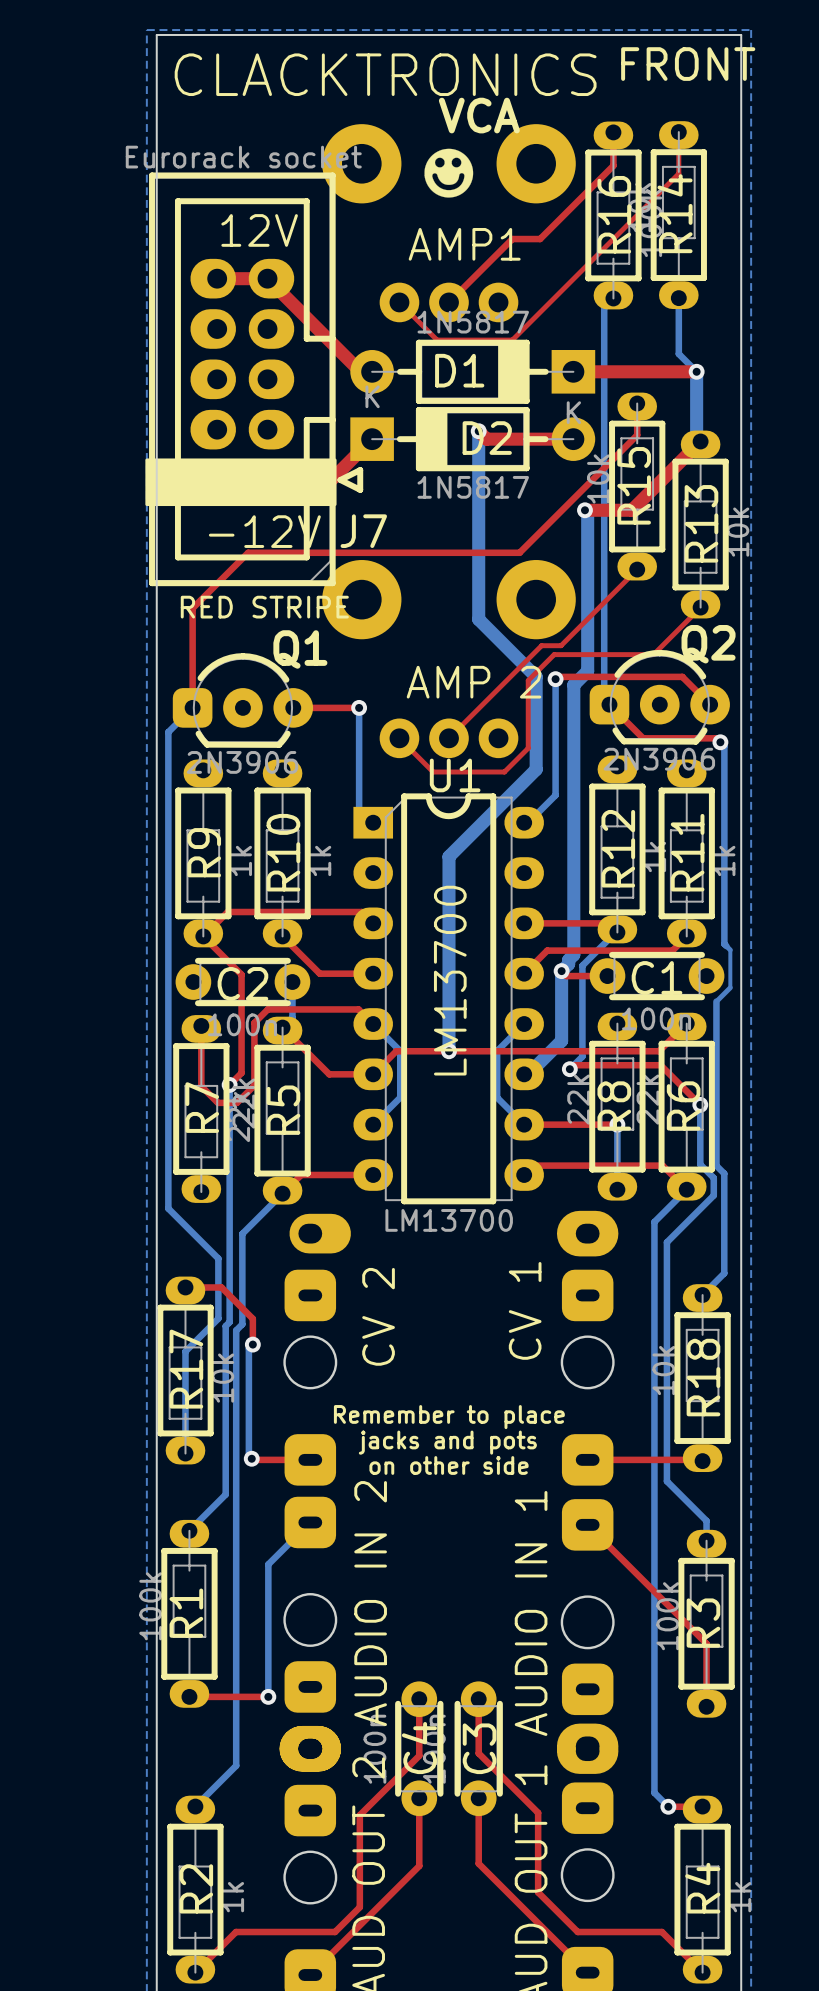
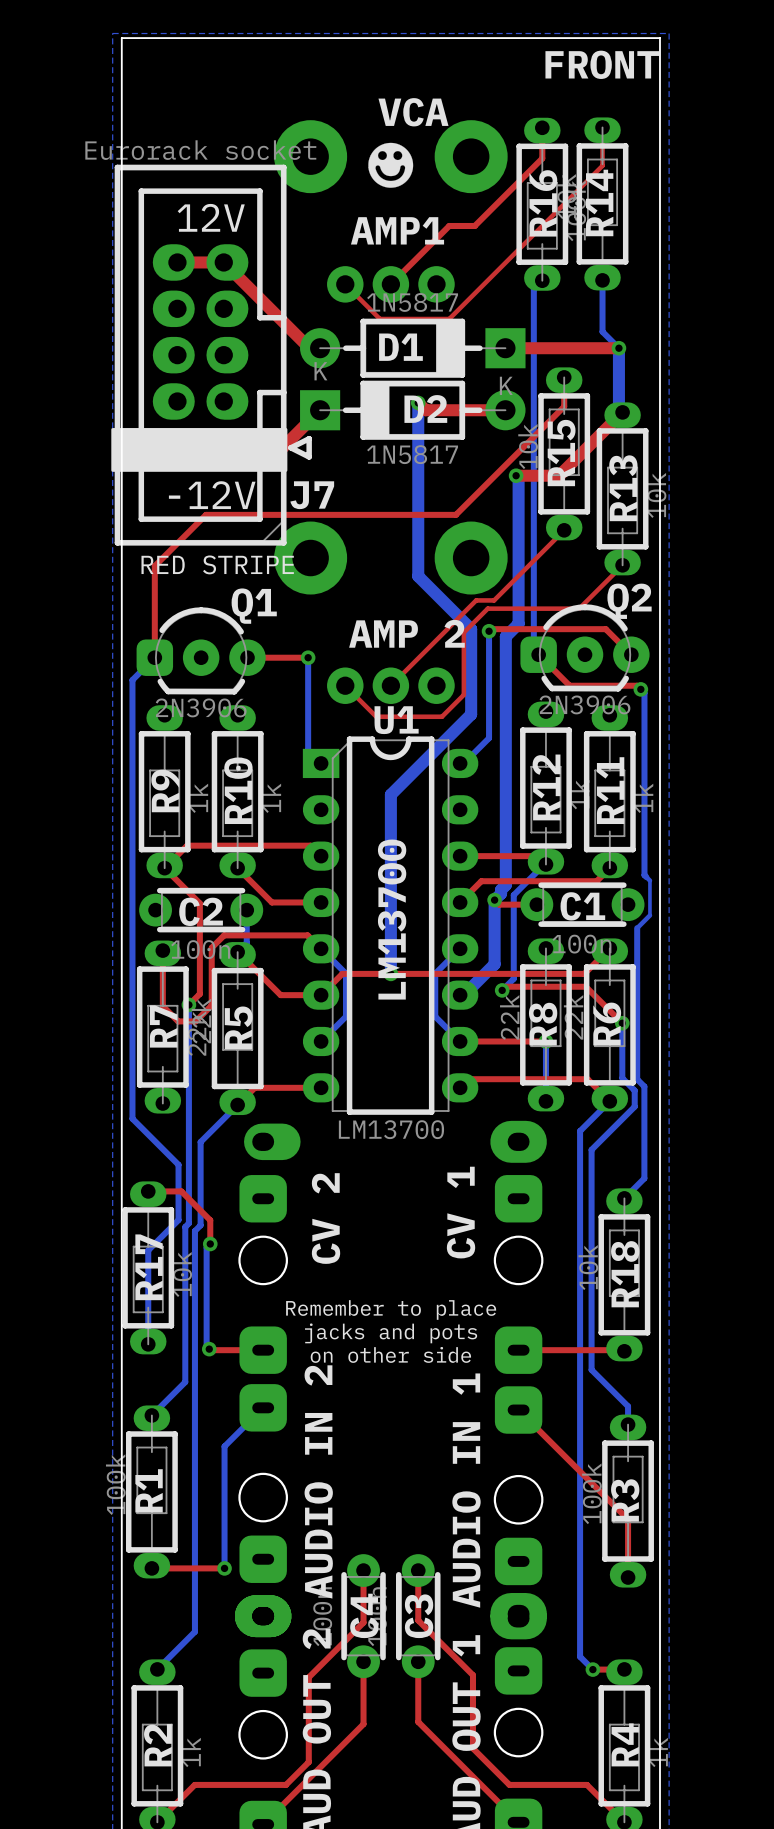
text: CLACKTRONICS (385, 74) -> none

